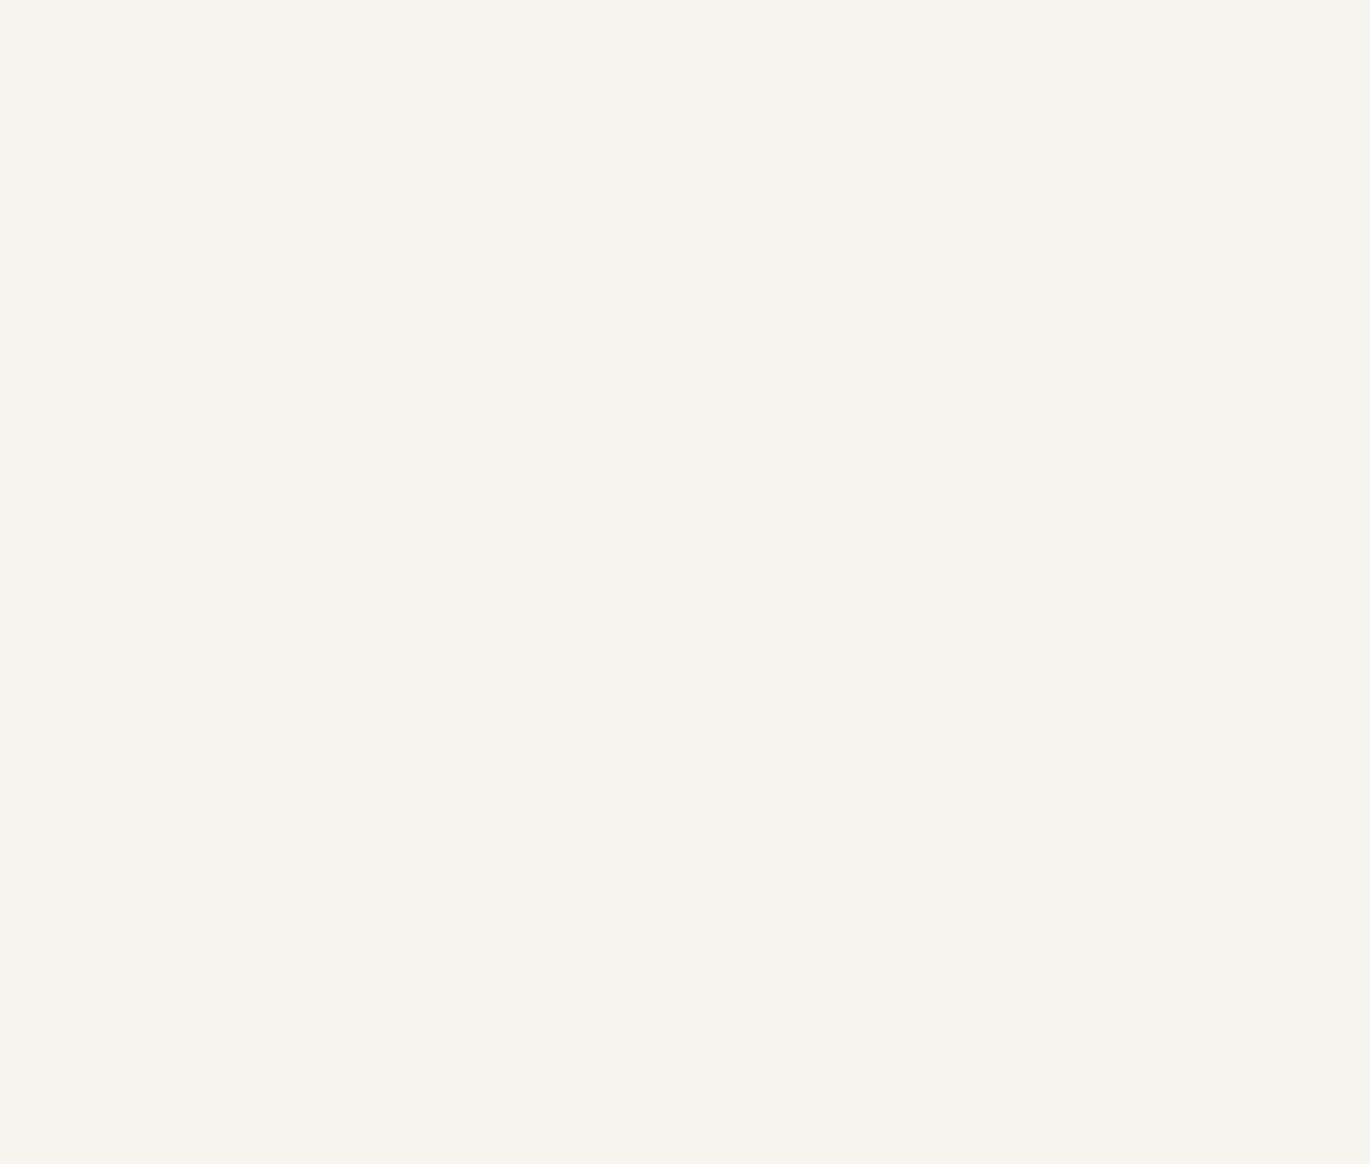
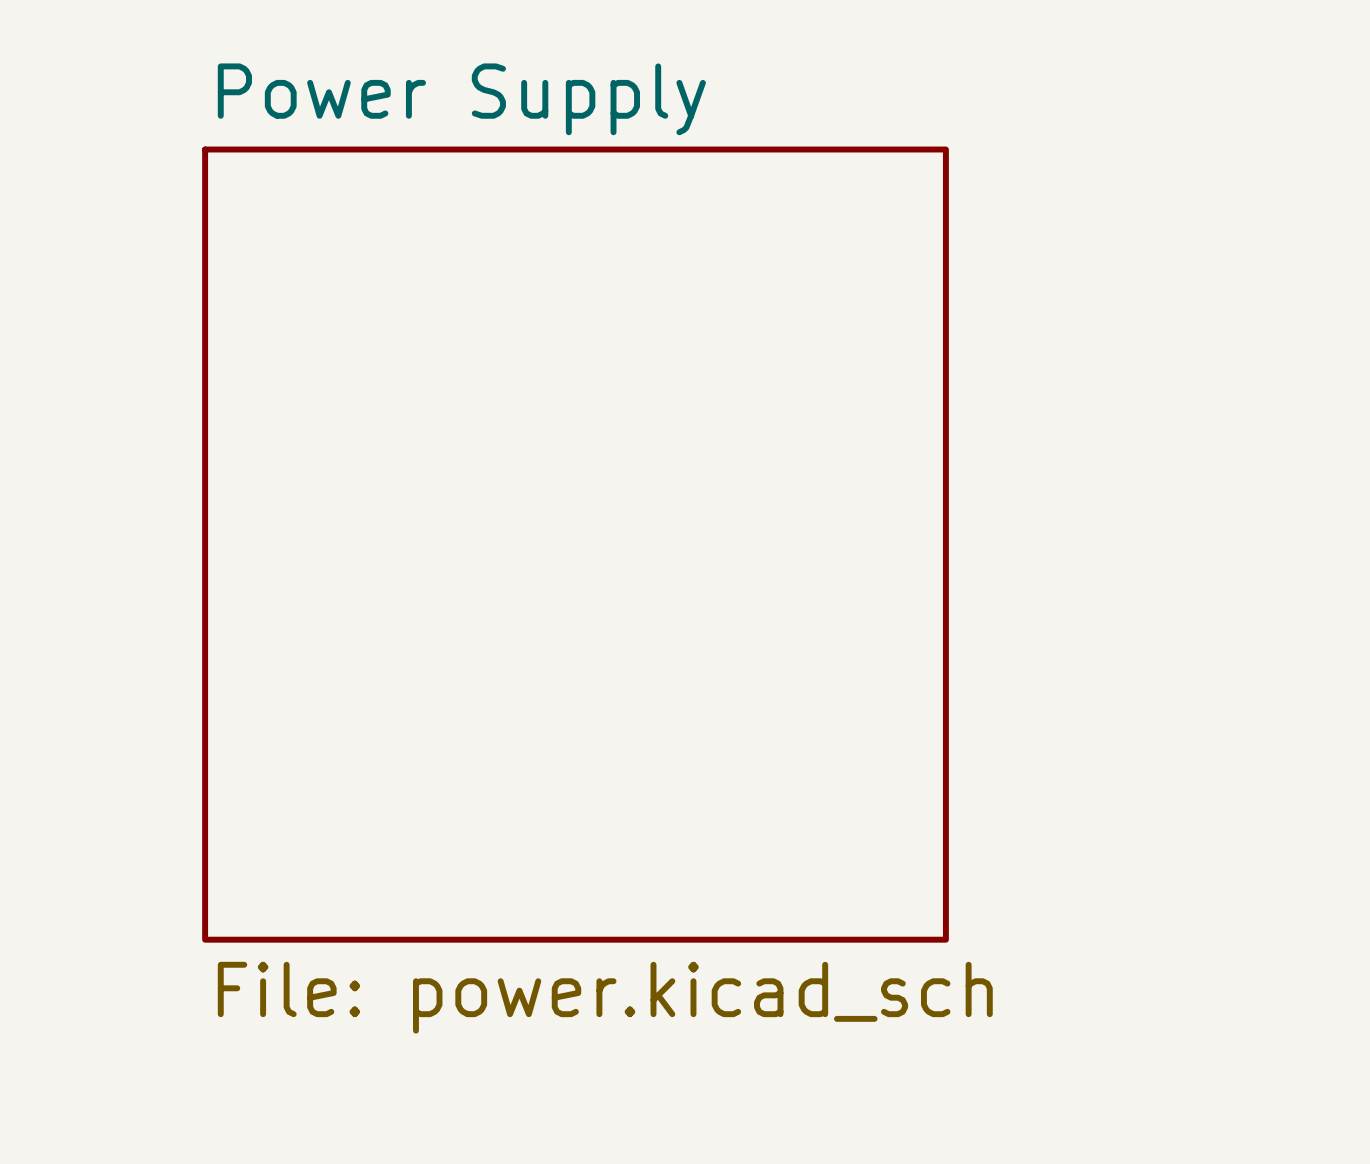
sheet Power Supply: none -> File: power.kicad_sch (575, 544)

